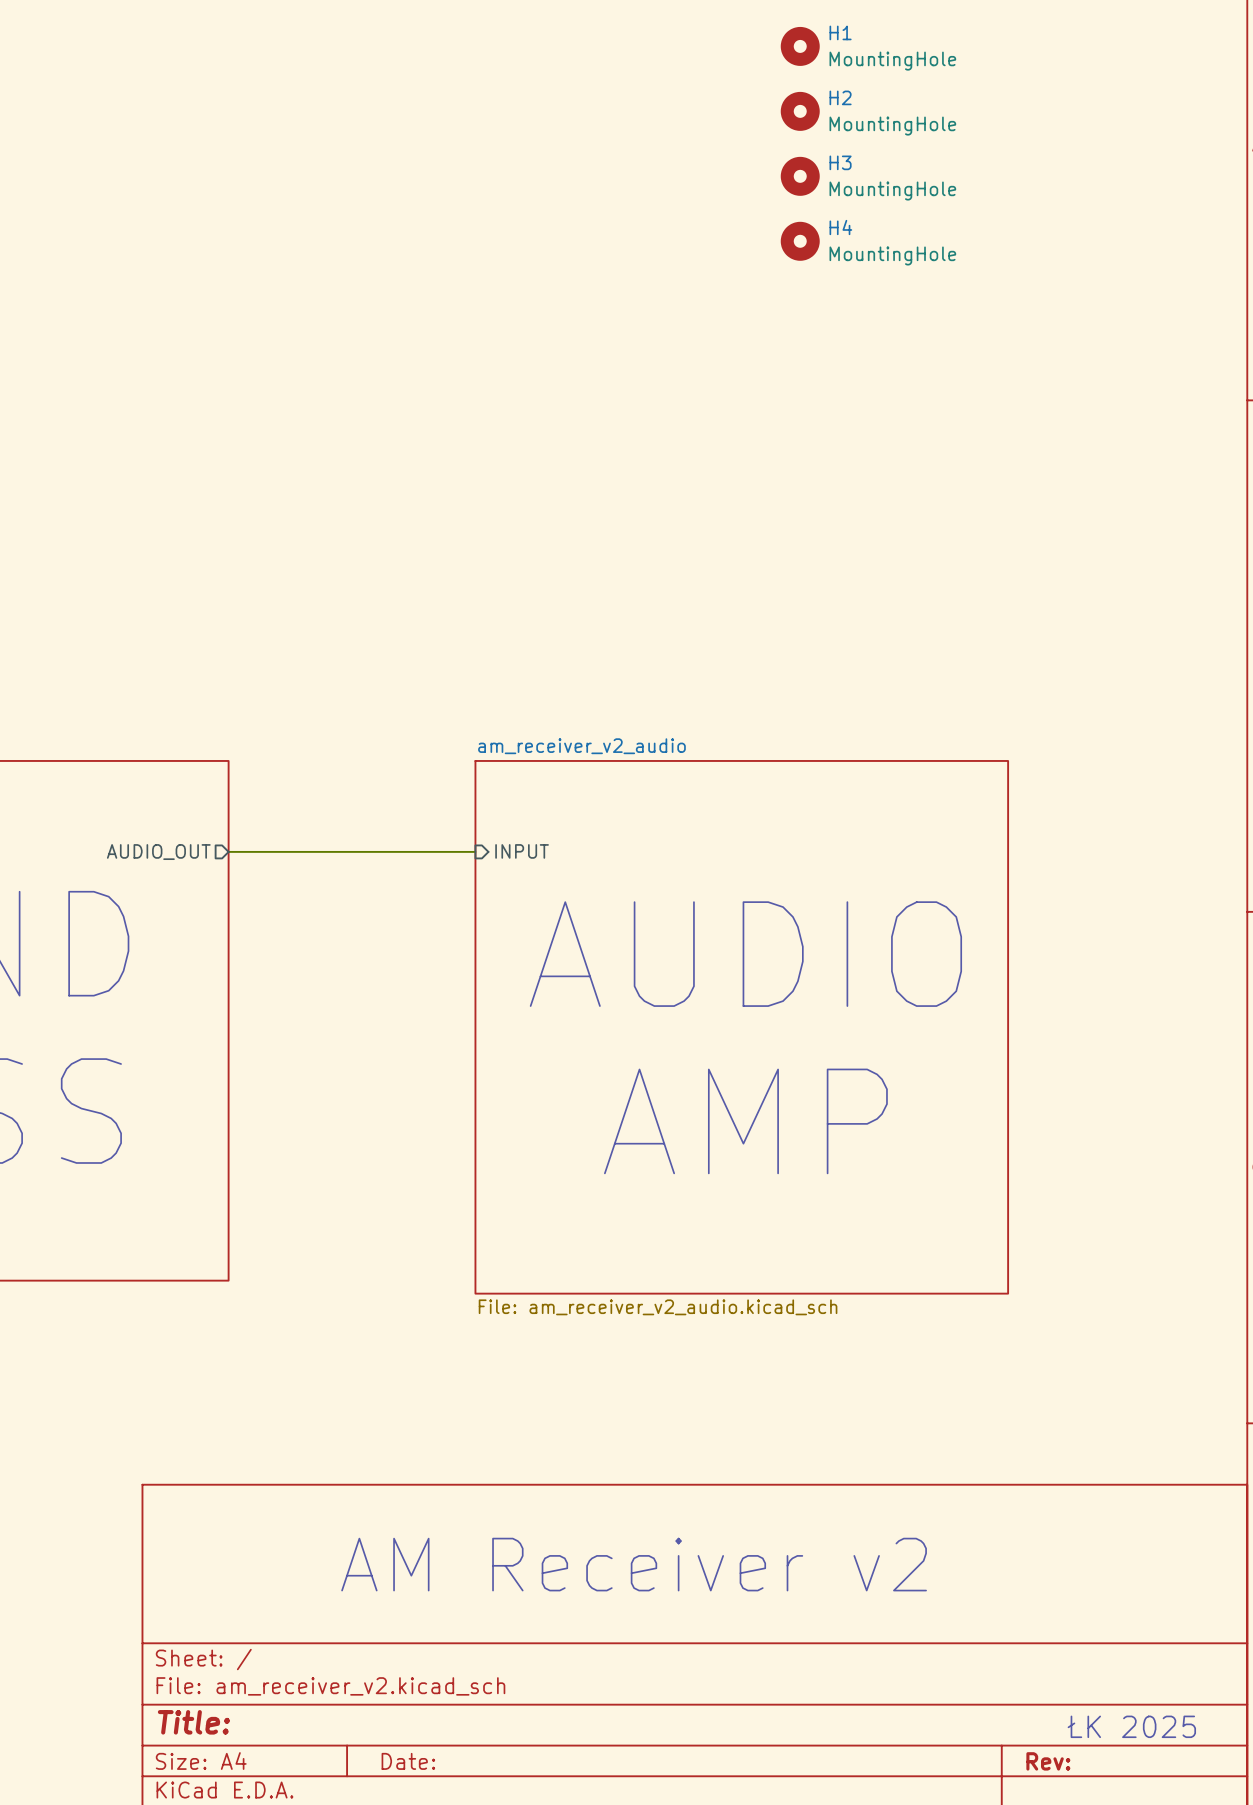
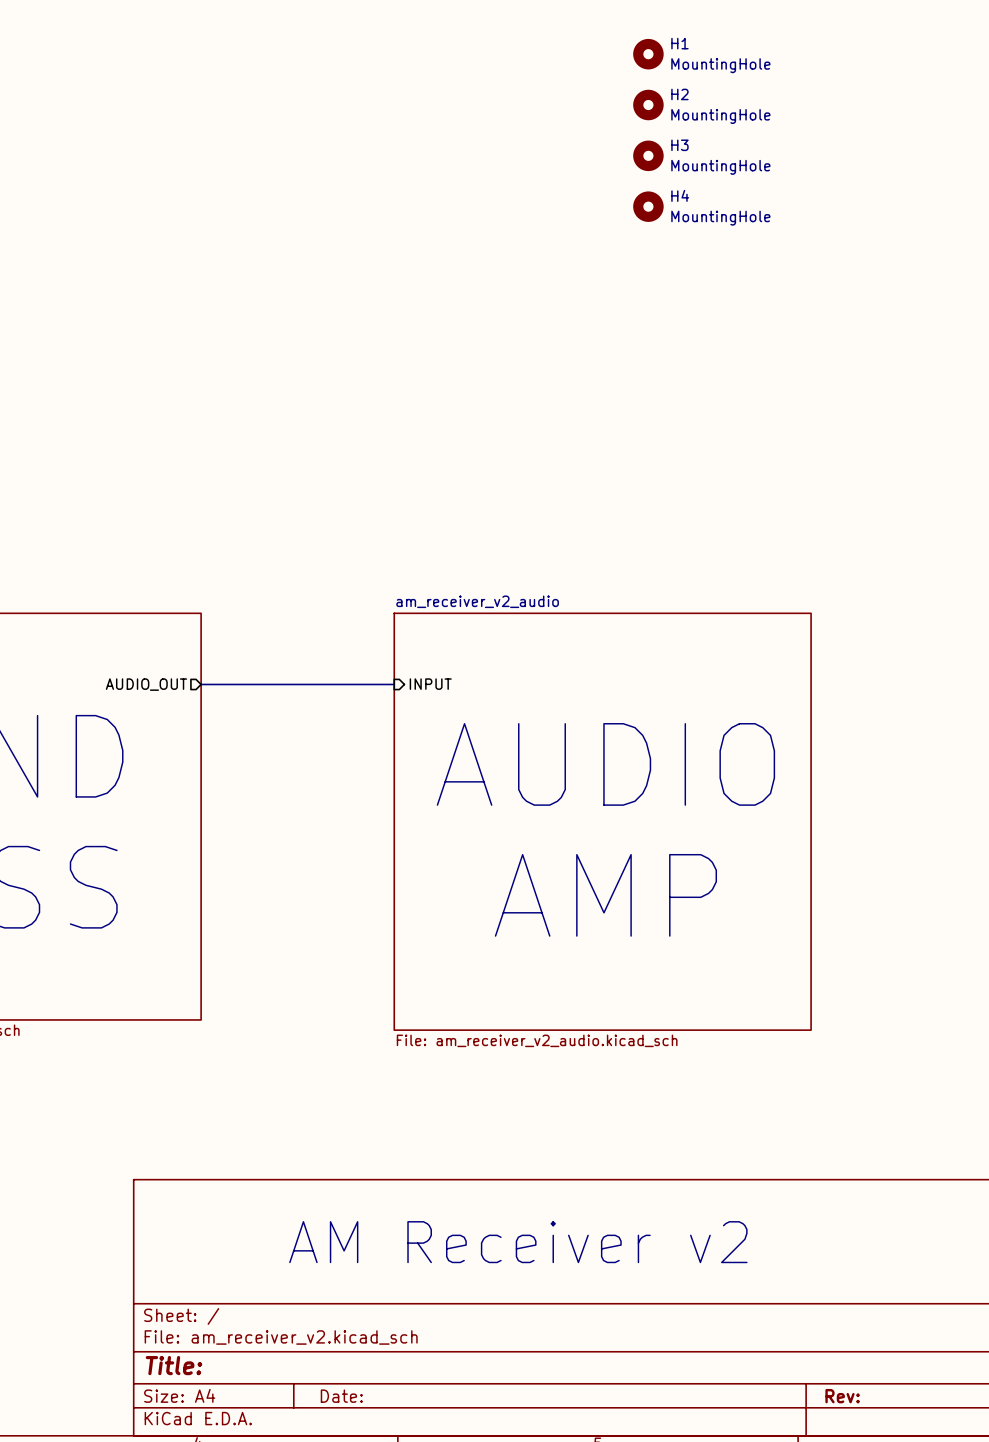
text: ŁK 2025 (1131, 1726) -> none

